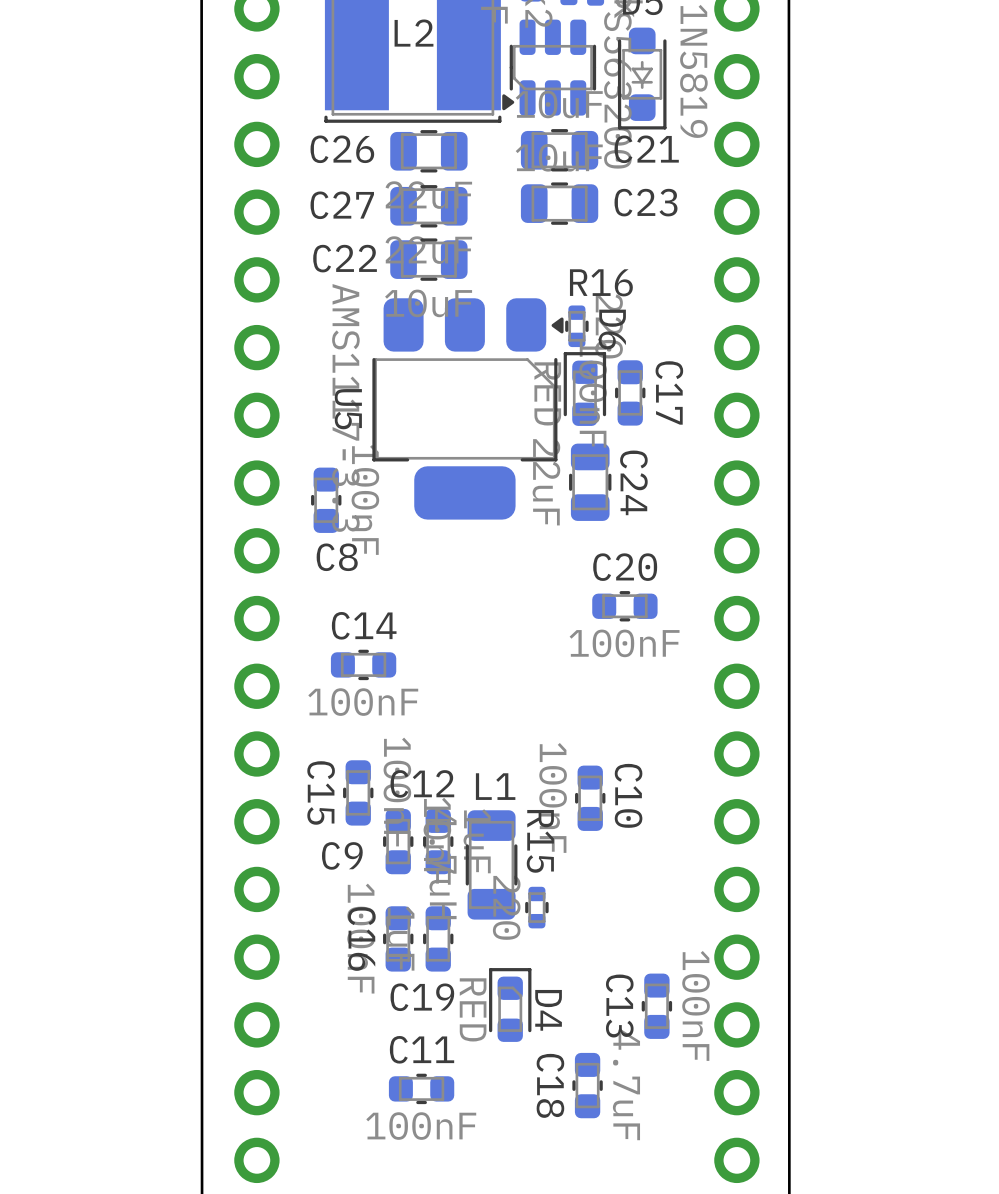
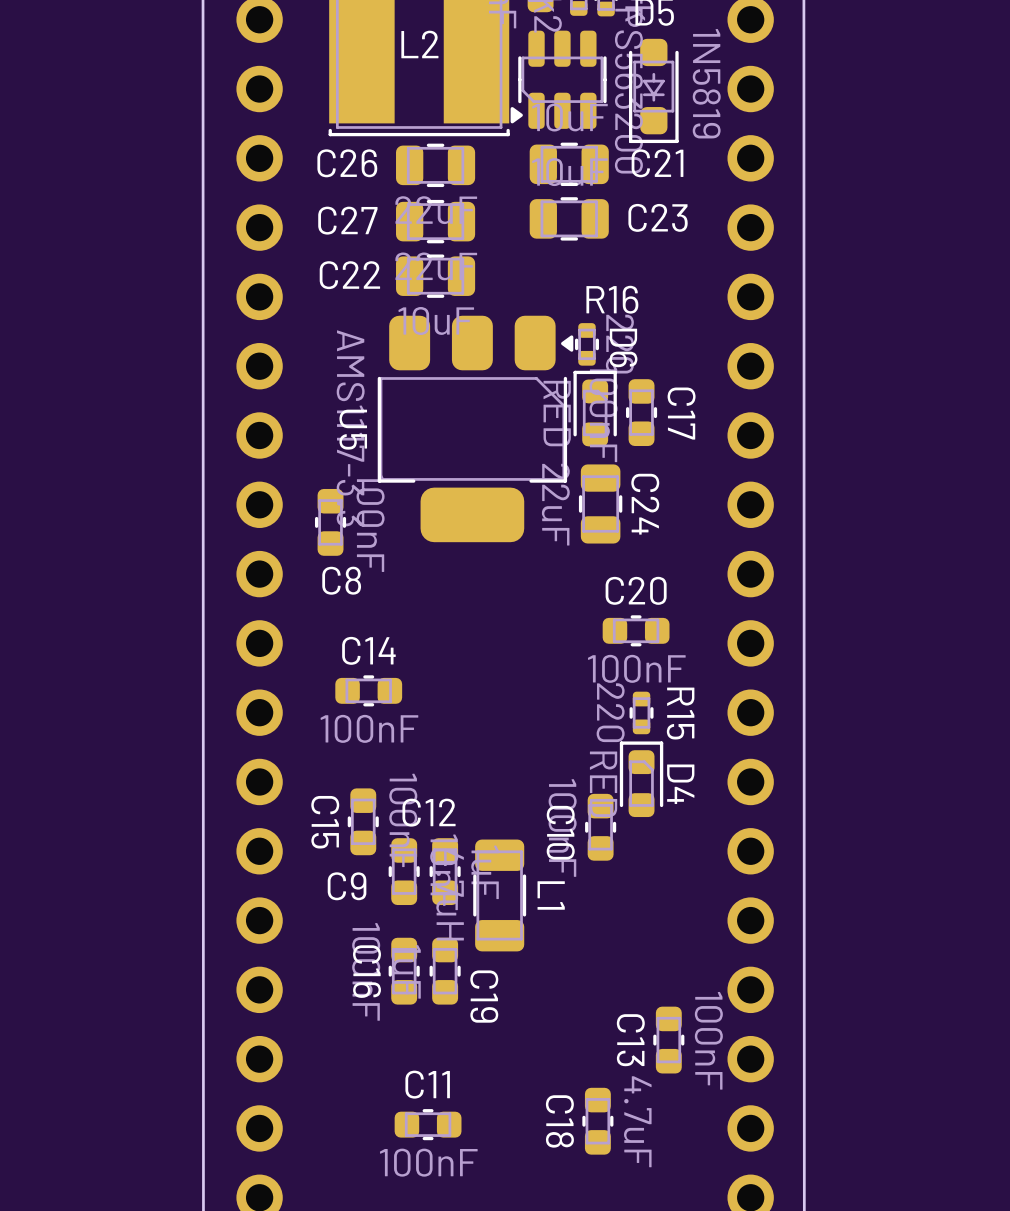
L1 name rotation: 0° (495, 786) -> 90° clockwise (551, 895)
L1 name position: L1 (495, 786) -> L1 (551, 895)
C10 name position: C10 (628, 795) -> C10 (560, 832)
R15 name position: R15 (540, 841) -> R15 (680, 713)
R15 position: (536, 907) -> (641, 712)
C19 name rotation: 0° (422, 997) -> 90° clockwise (484, 996)
D4 position: (510, 1004) -> (641, 779)

